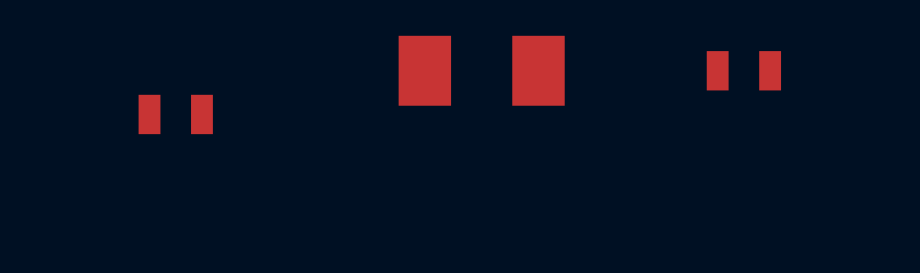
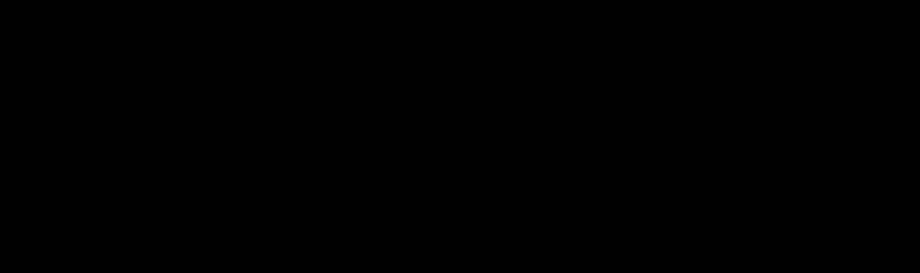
part: (481, 70) -> none
part: (743, 70) -> none
part: (175, 114) -> none

